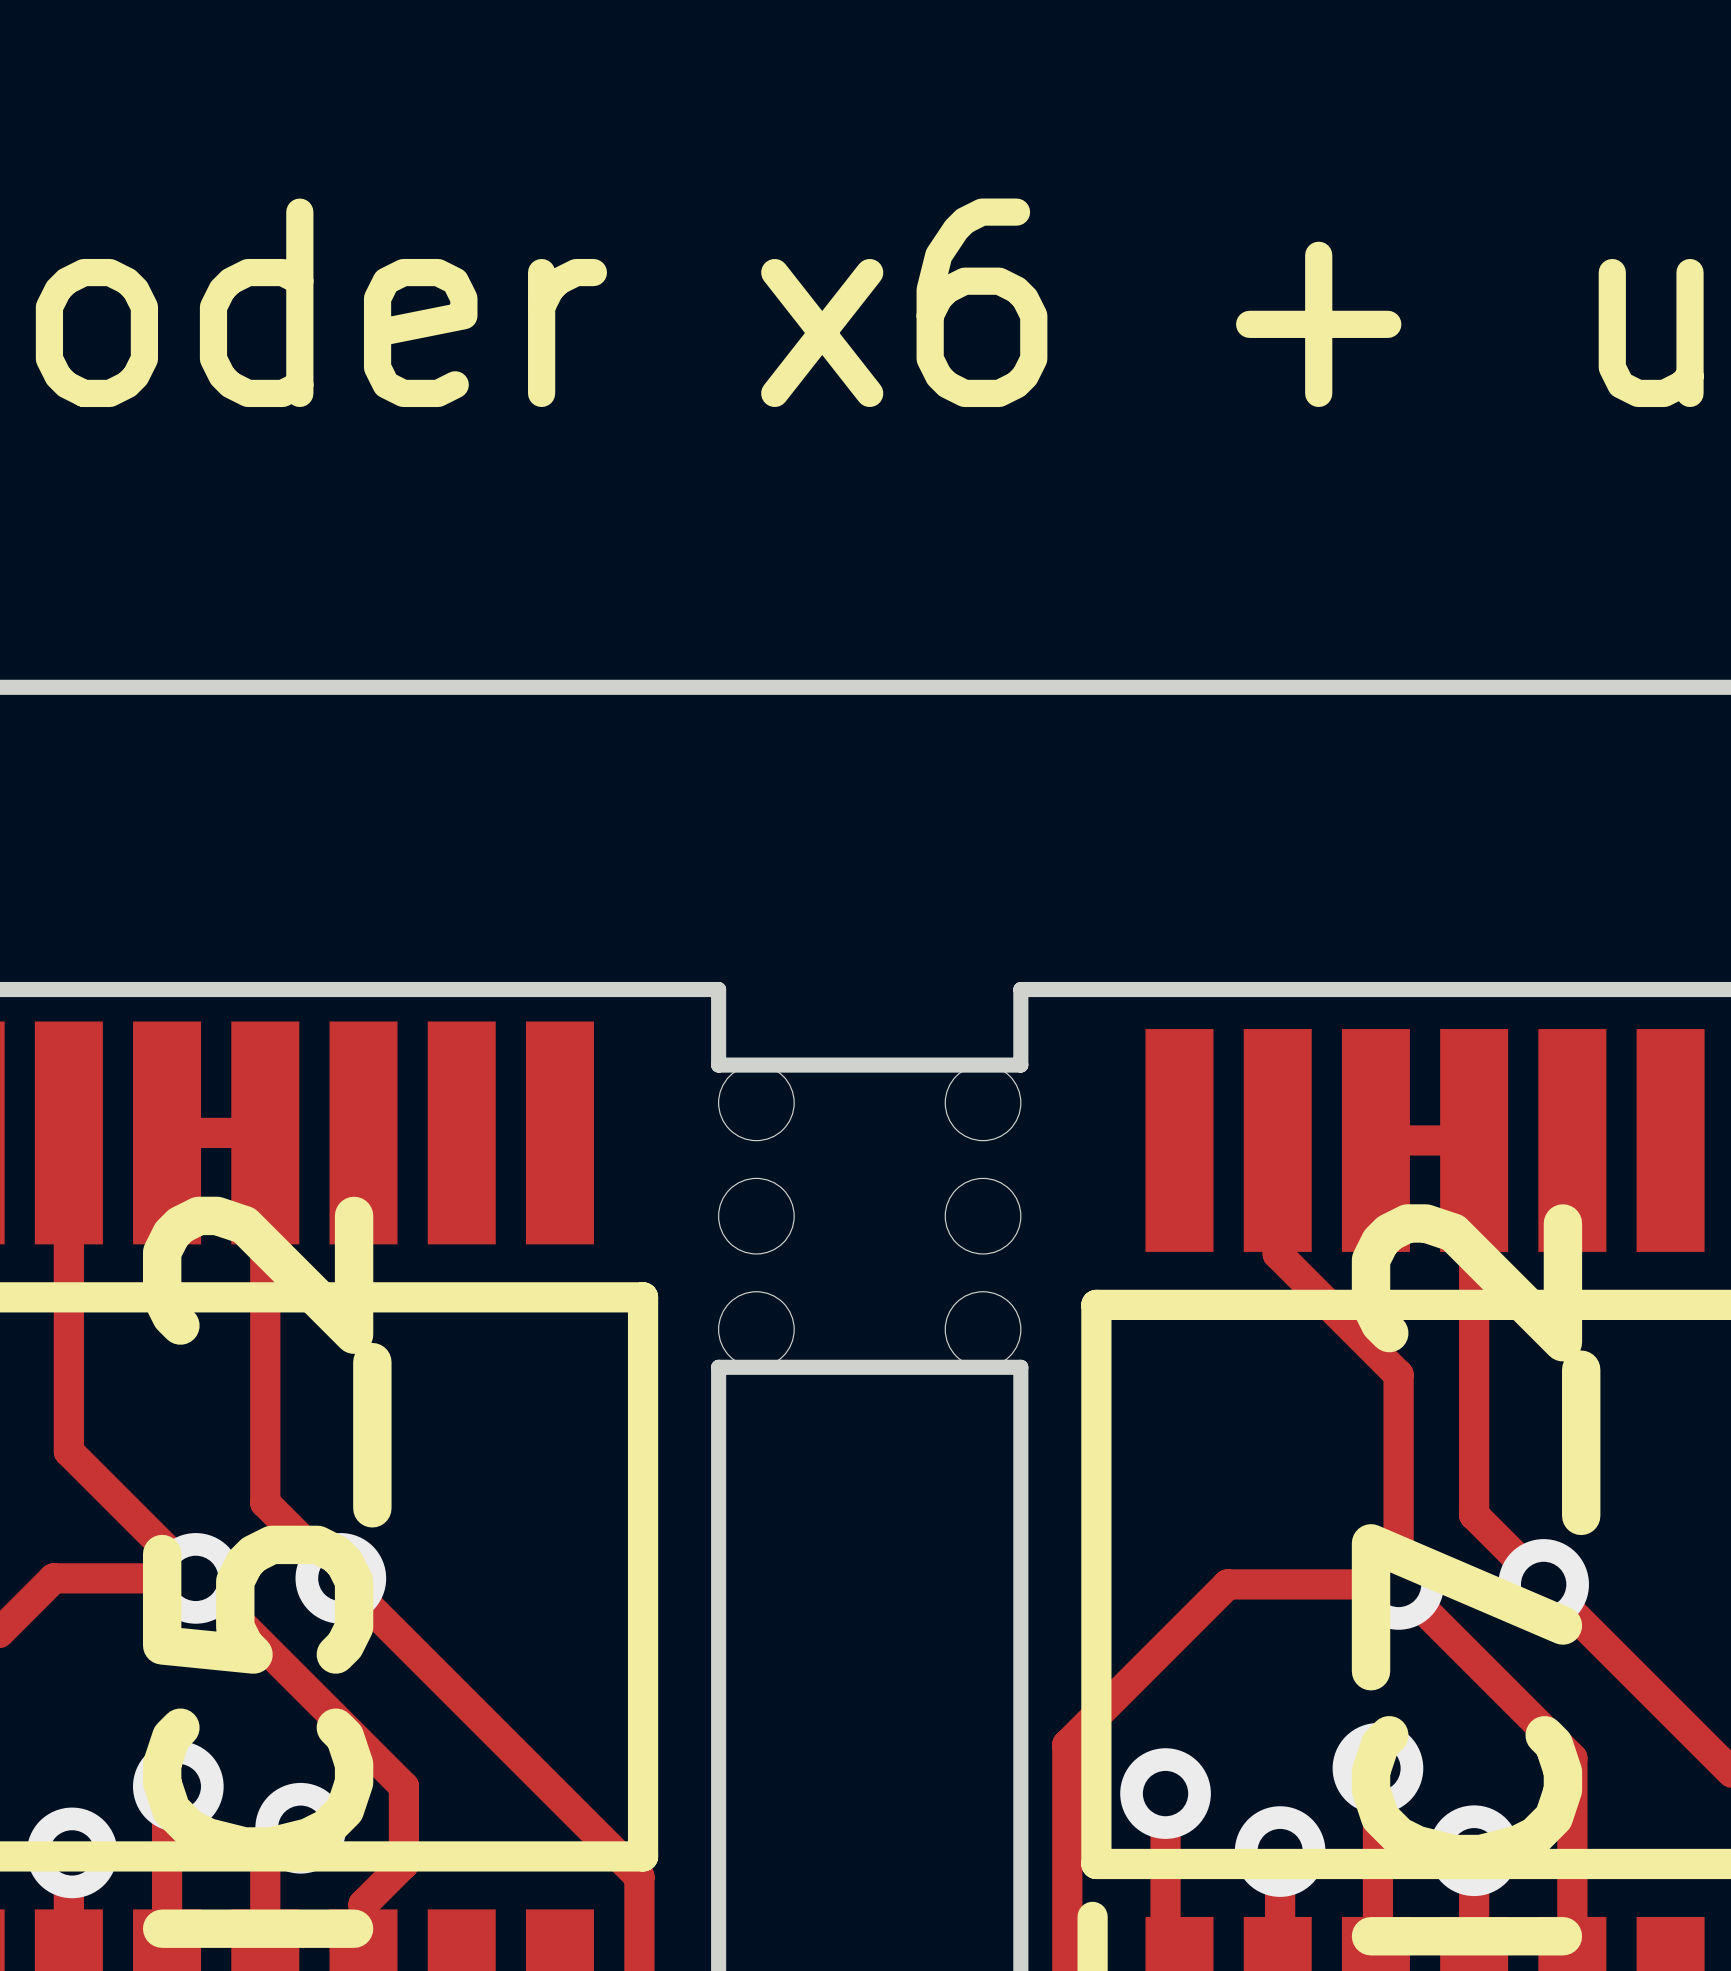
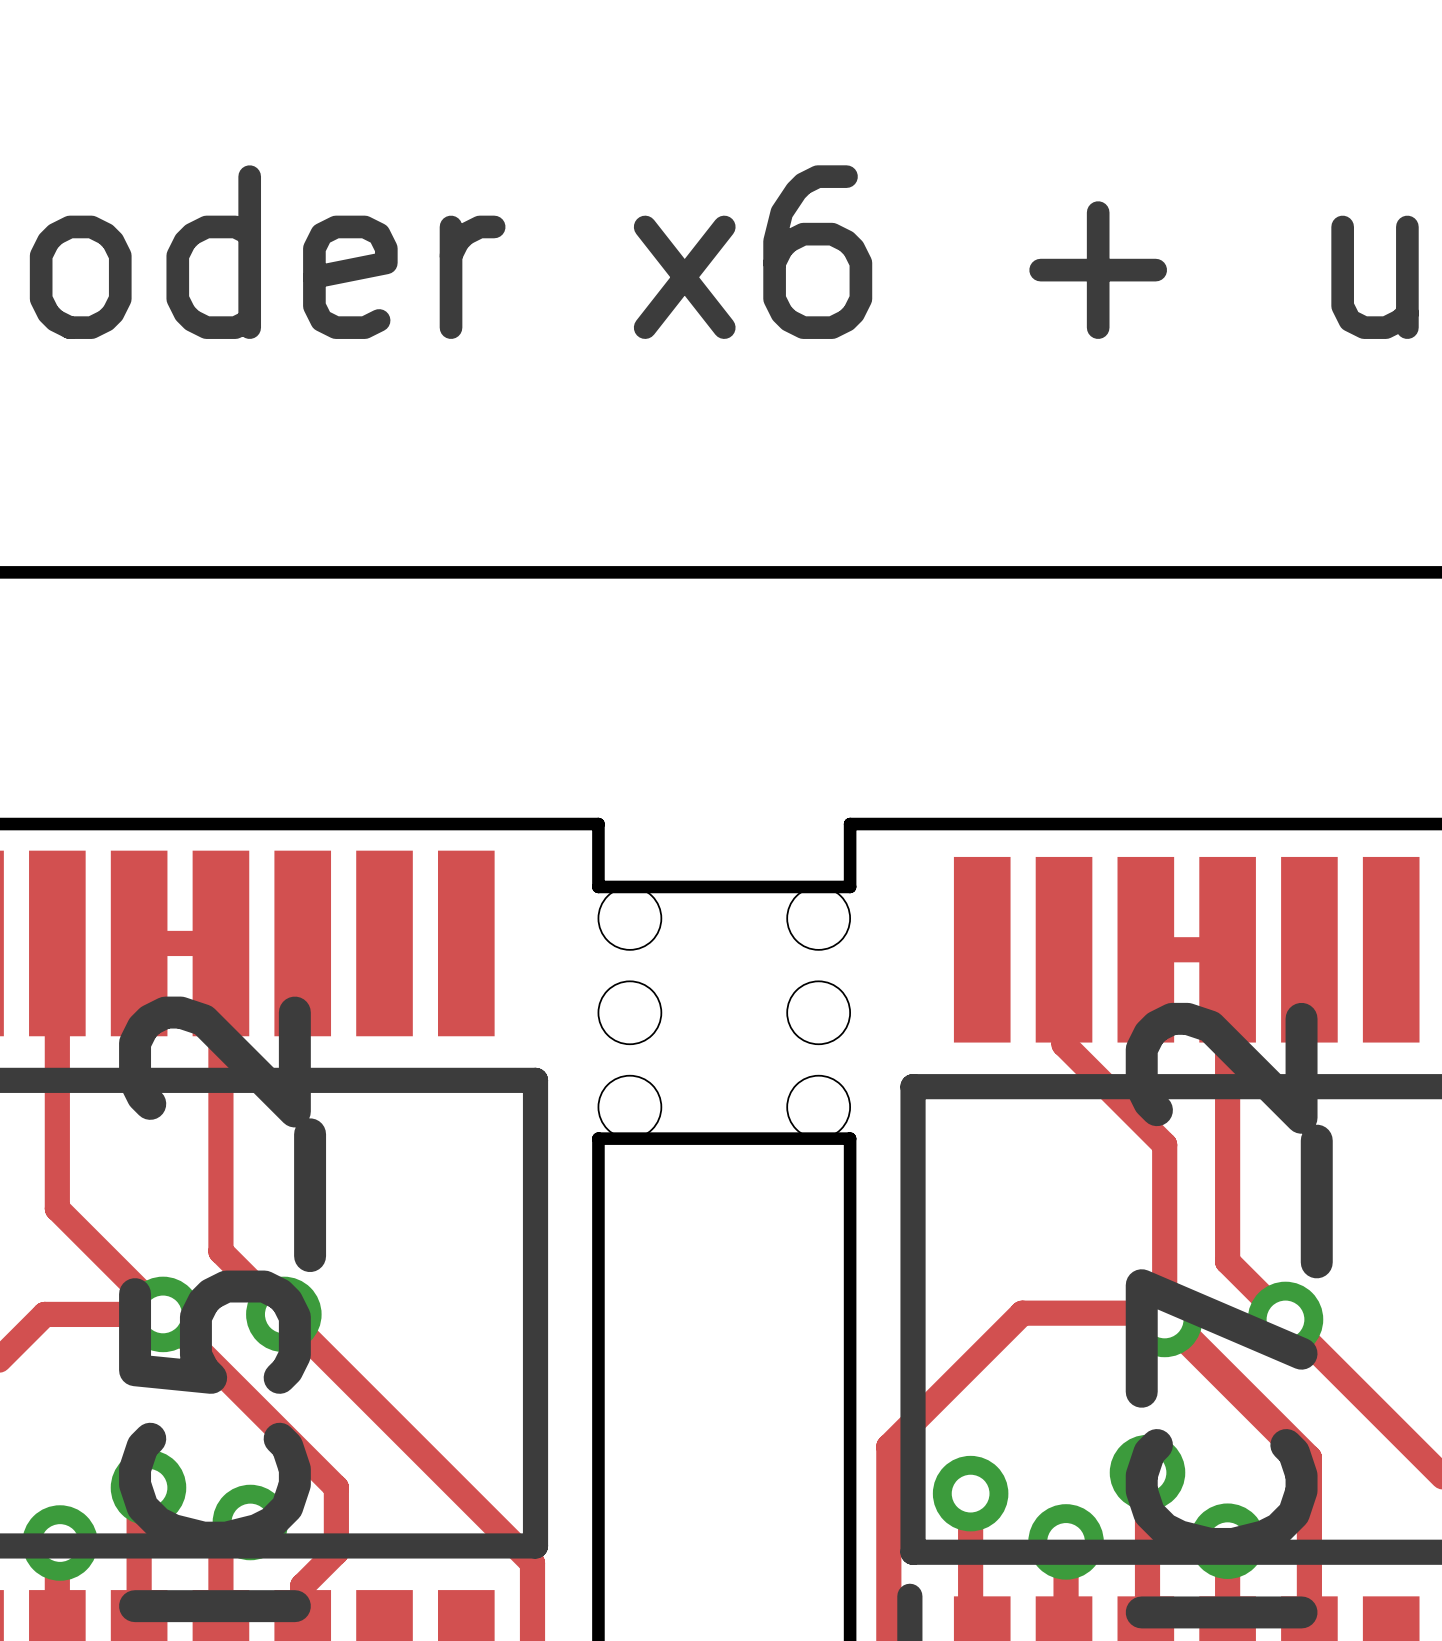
track: (1398, 1576) (1398, 1584) (1227, 1584) (1067, 1744) -> (1309, 1464) (1309, 1457) (1164, 1313) (1022, 1313) (888, 1446) (888, 1452)

